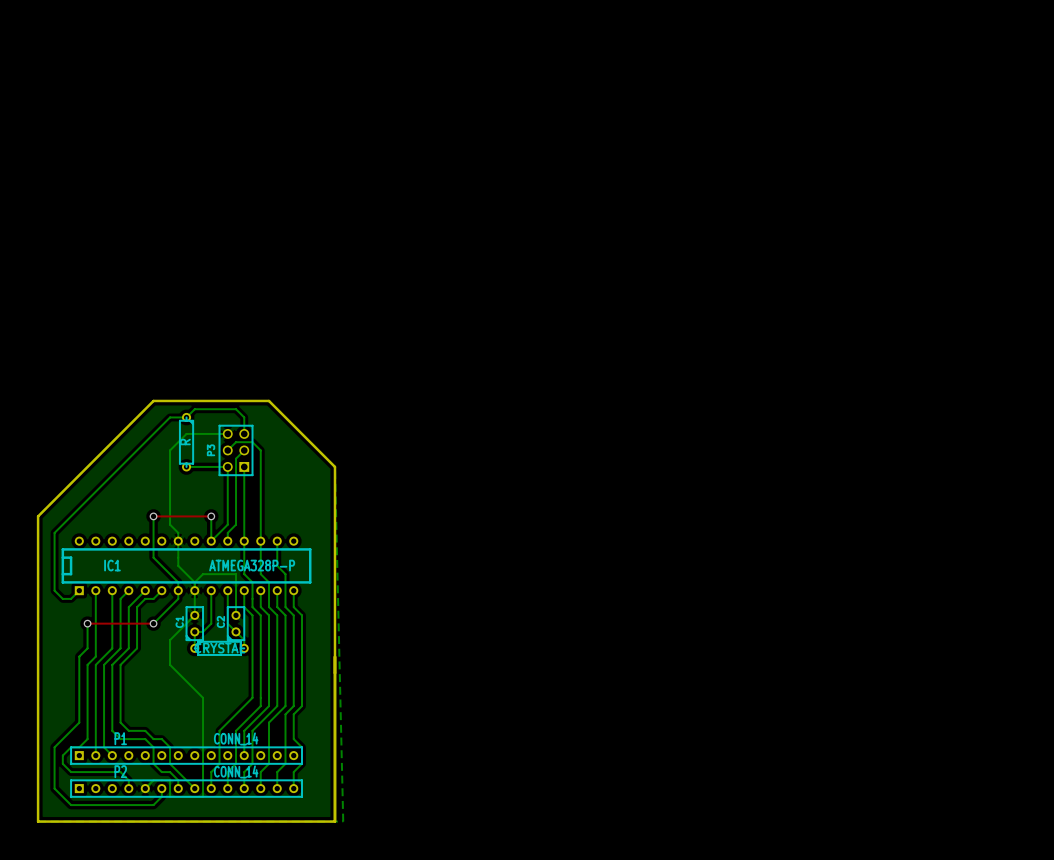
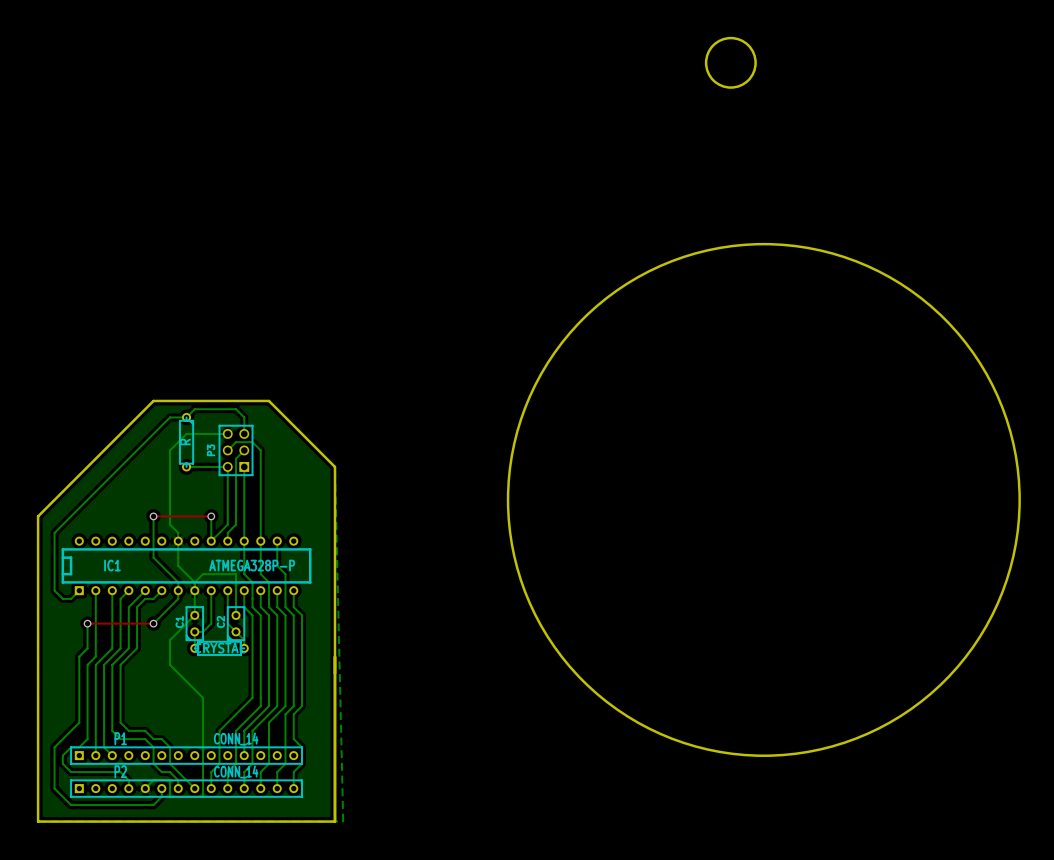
round board edge: none -> [704, 36, 757, 89]
round board edge: none -> [506, 242, 1021, 757]

